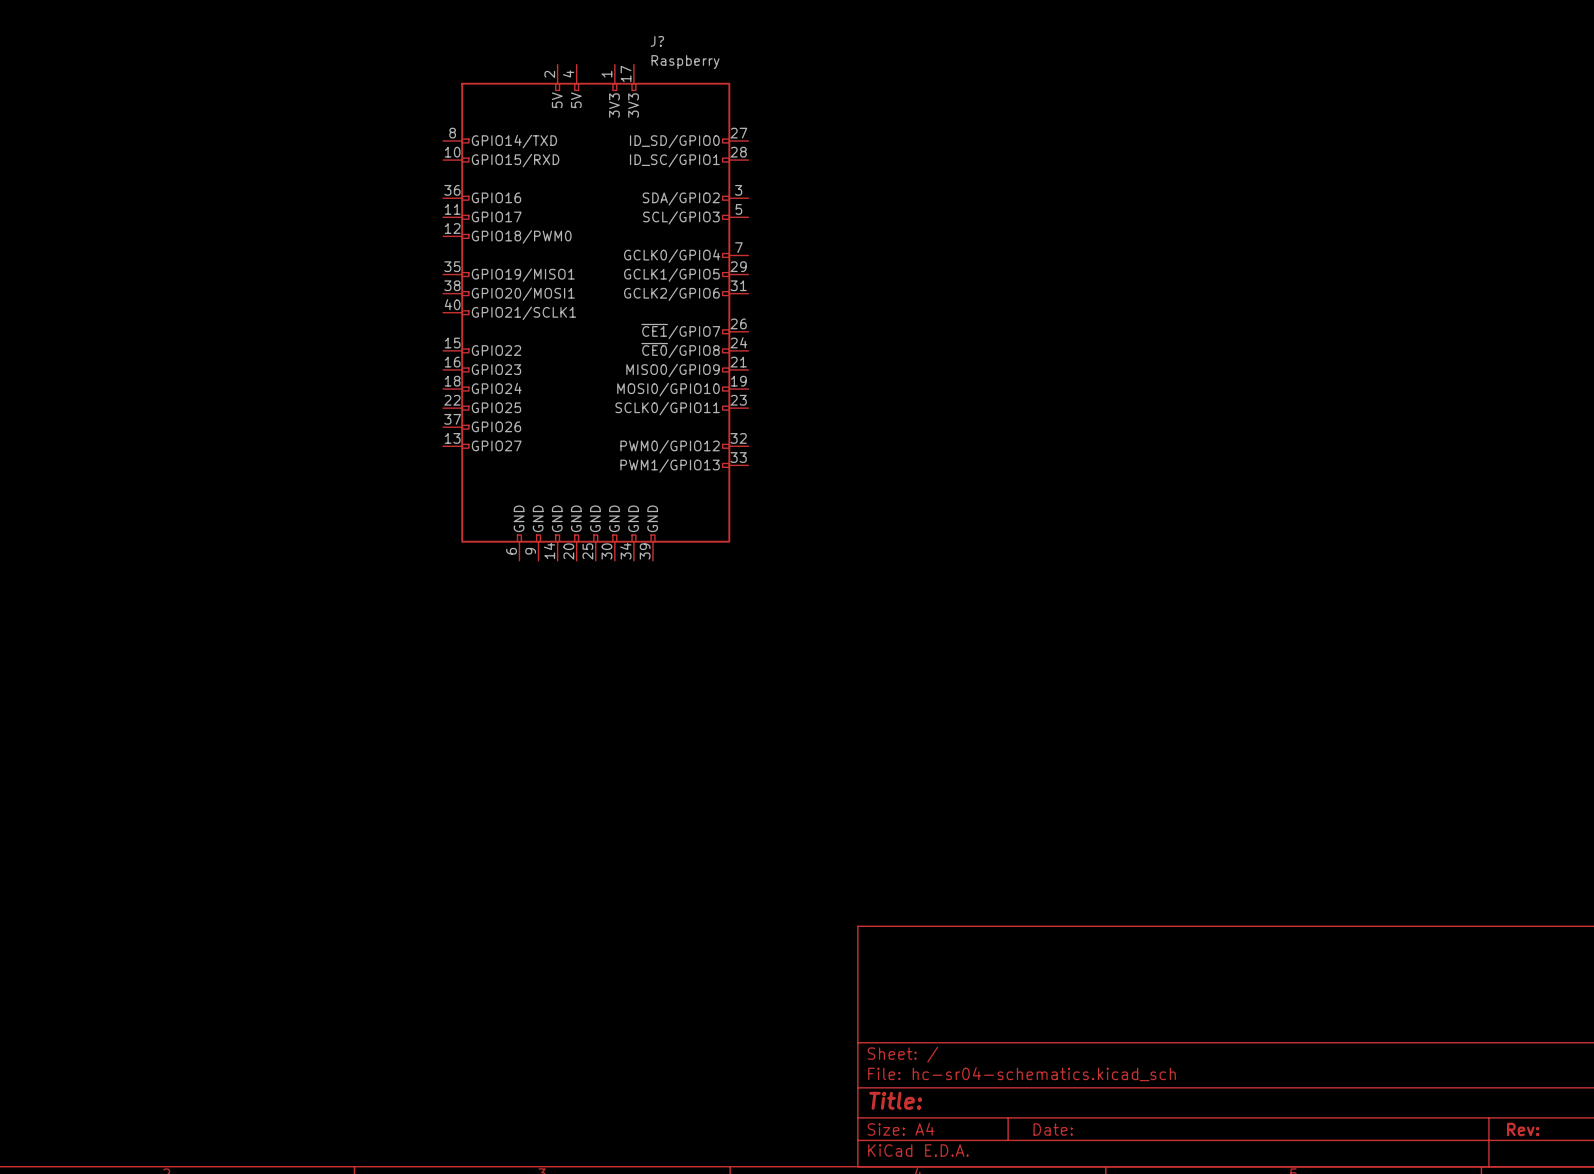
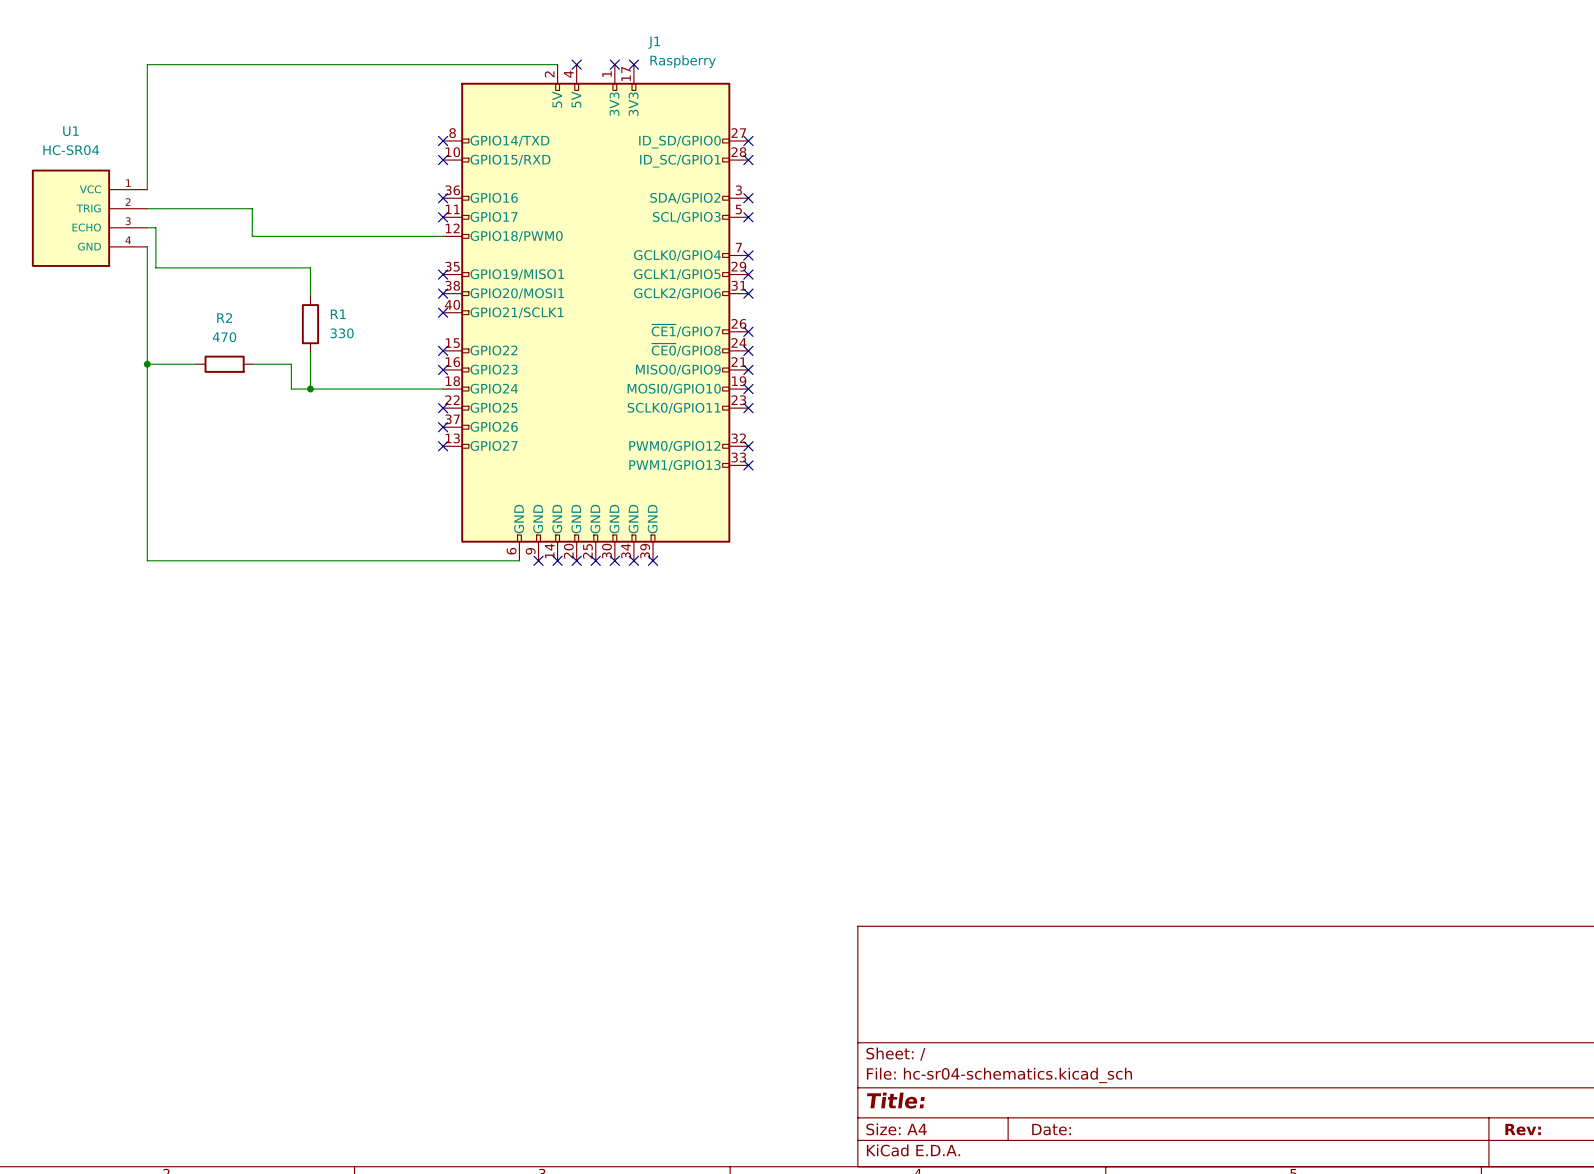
J? name: J? (657, 41) -> J1 (654, 42)
wire: none -> (557, 64) (147, 64) (147, 189)
no-connect mark: none -> (576, 64)
no-connect mark: none -> (614, 64)
no-connect mark: none -> (633, 64)
no-connect mark: none -> (443, 140)
no-connect mark: none -> (748, 140)
no-connect mark: none -> (443, 160)
no-connect mark: none -> (748, 160)
no-connect mark: none -> (443, 198)
no-connect mark: none -> (748, 198)
wire: none -> (147, 208) (252, 208) (252, 236) (443, 236)
no-connect mark: none -> (443, 217)
no-connect mark: none -> (748, 217)
U1: none -> HC-SR04 (89, 218)
wire: none -> (147, 227) (155, 227) (155, 267) (310, 267) (310, 295)
wire: none -> (147, 246) (147, 560) (519, 560)
no-connect mark: none -> (748, 255)
no-connect mark: none -> (443, 274)
no-connect mark: none -> (748, 274)
no-connect mark: none -> (443, 293)
no-connect mark: none -> (748, 293)
no-connect mark: none -> (443, 312)
R1: none -> 330 (310, 324)
no-connect mark: none -> (748, 331)
no-connect mark: none -> (443, 350)
no-connect mark: none -> (748, 350)
wire: none -> (310, 352) (310, 389)
wire: none -> (147, 364) (195, 364)
junction: none -> (147, 364)
R2: none -> 470 (224, 364)
wire: none -> (253, 364) (291, 364) (291, 389) (443, 389)
no-connect mark: none -> (443, 369)
no-connect mark: none -> (748, 369)
junction: none -> (310, 389)
no-connect mark: none -> (748, 389)
no-connect mark: none -> (443, 408)
no-connect mark: none -> (748, 408)
no-connect mark: none -> (443, 427)
no-connect mark: none -> (443, 446)
no-connect mark: none -> (748, 446)
no-connect mark: none -> (748, 465)
no-connect mark: none -> (538, 560)
no-connect mark: none -> (557, 560)
no-connect mark: none -> (576, 560)
no-connect mark: none -> (595, 560)
no-connect mark: none -> (614, 560)
no-connect mark: none -> (633, 560)
no-connect mark: none -> (653, 560)

